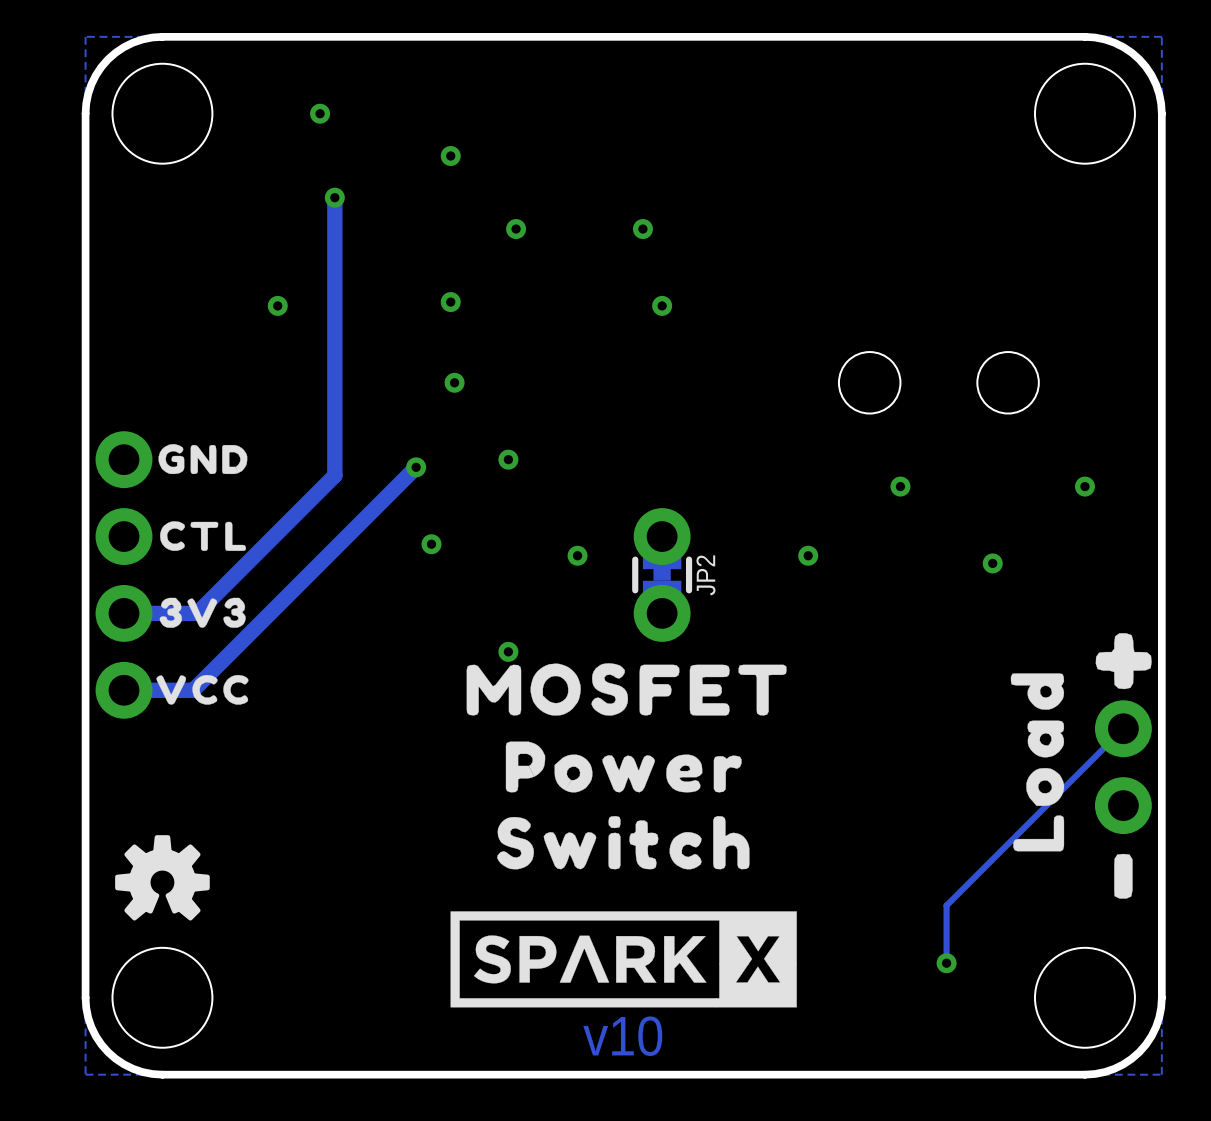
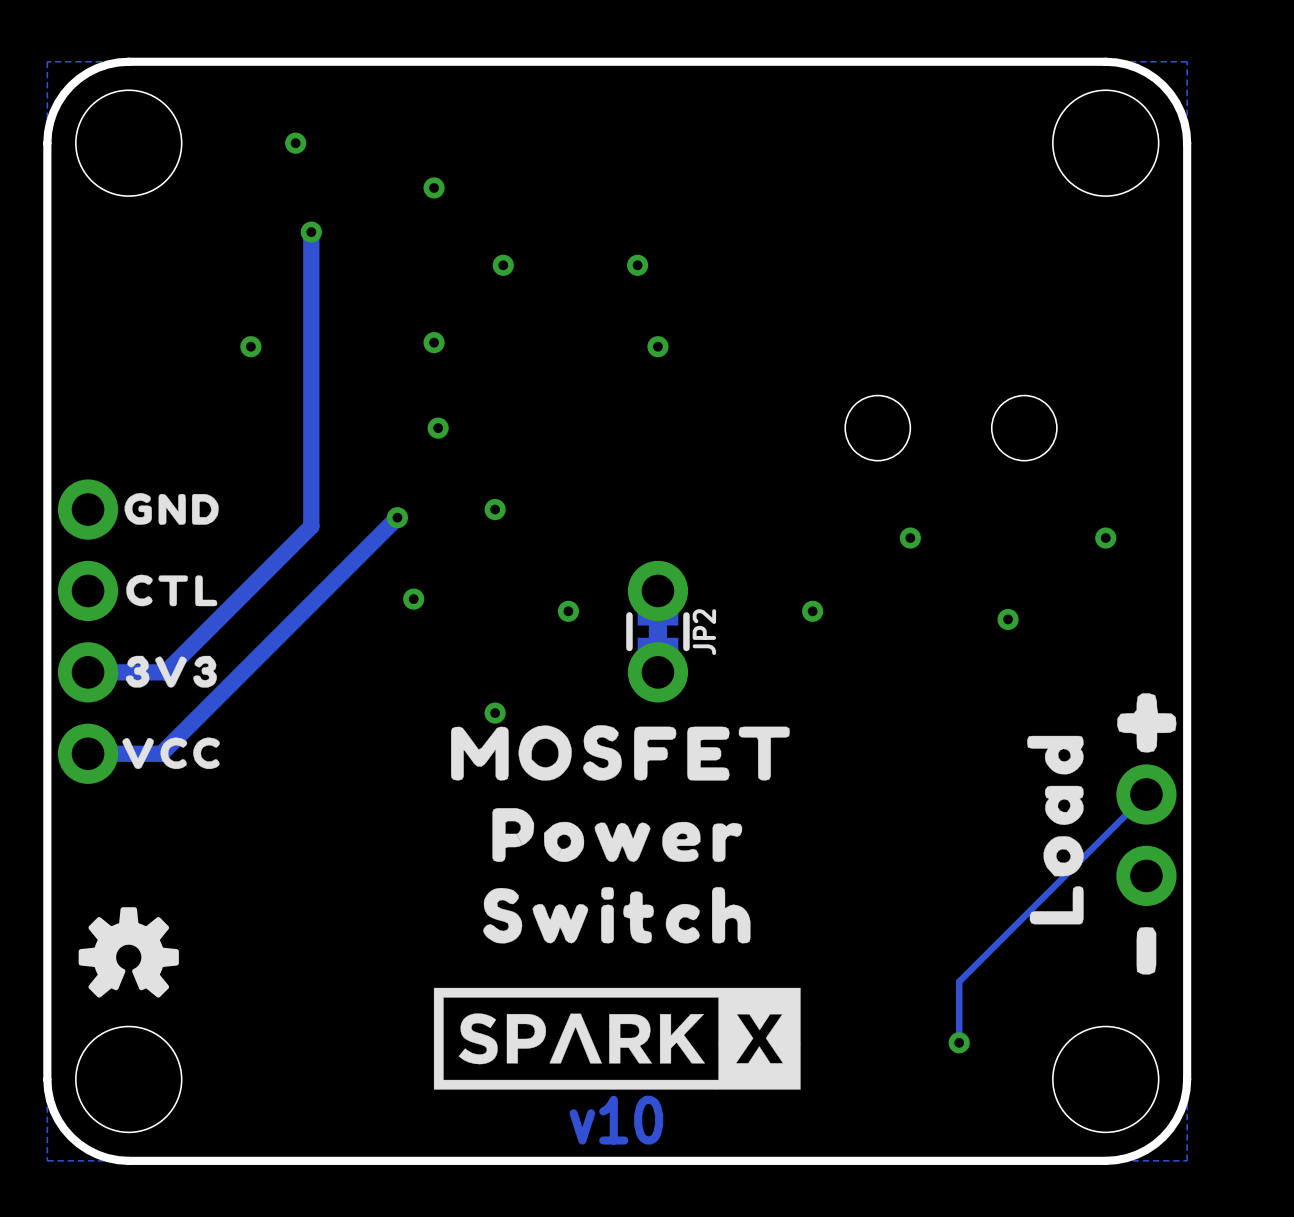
JP2 footprint: [632, 508, 693, 642] -> [626, 560, 690, 703]

